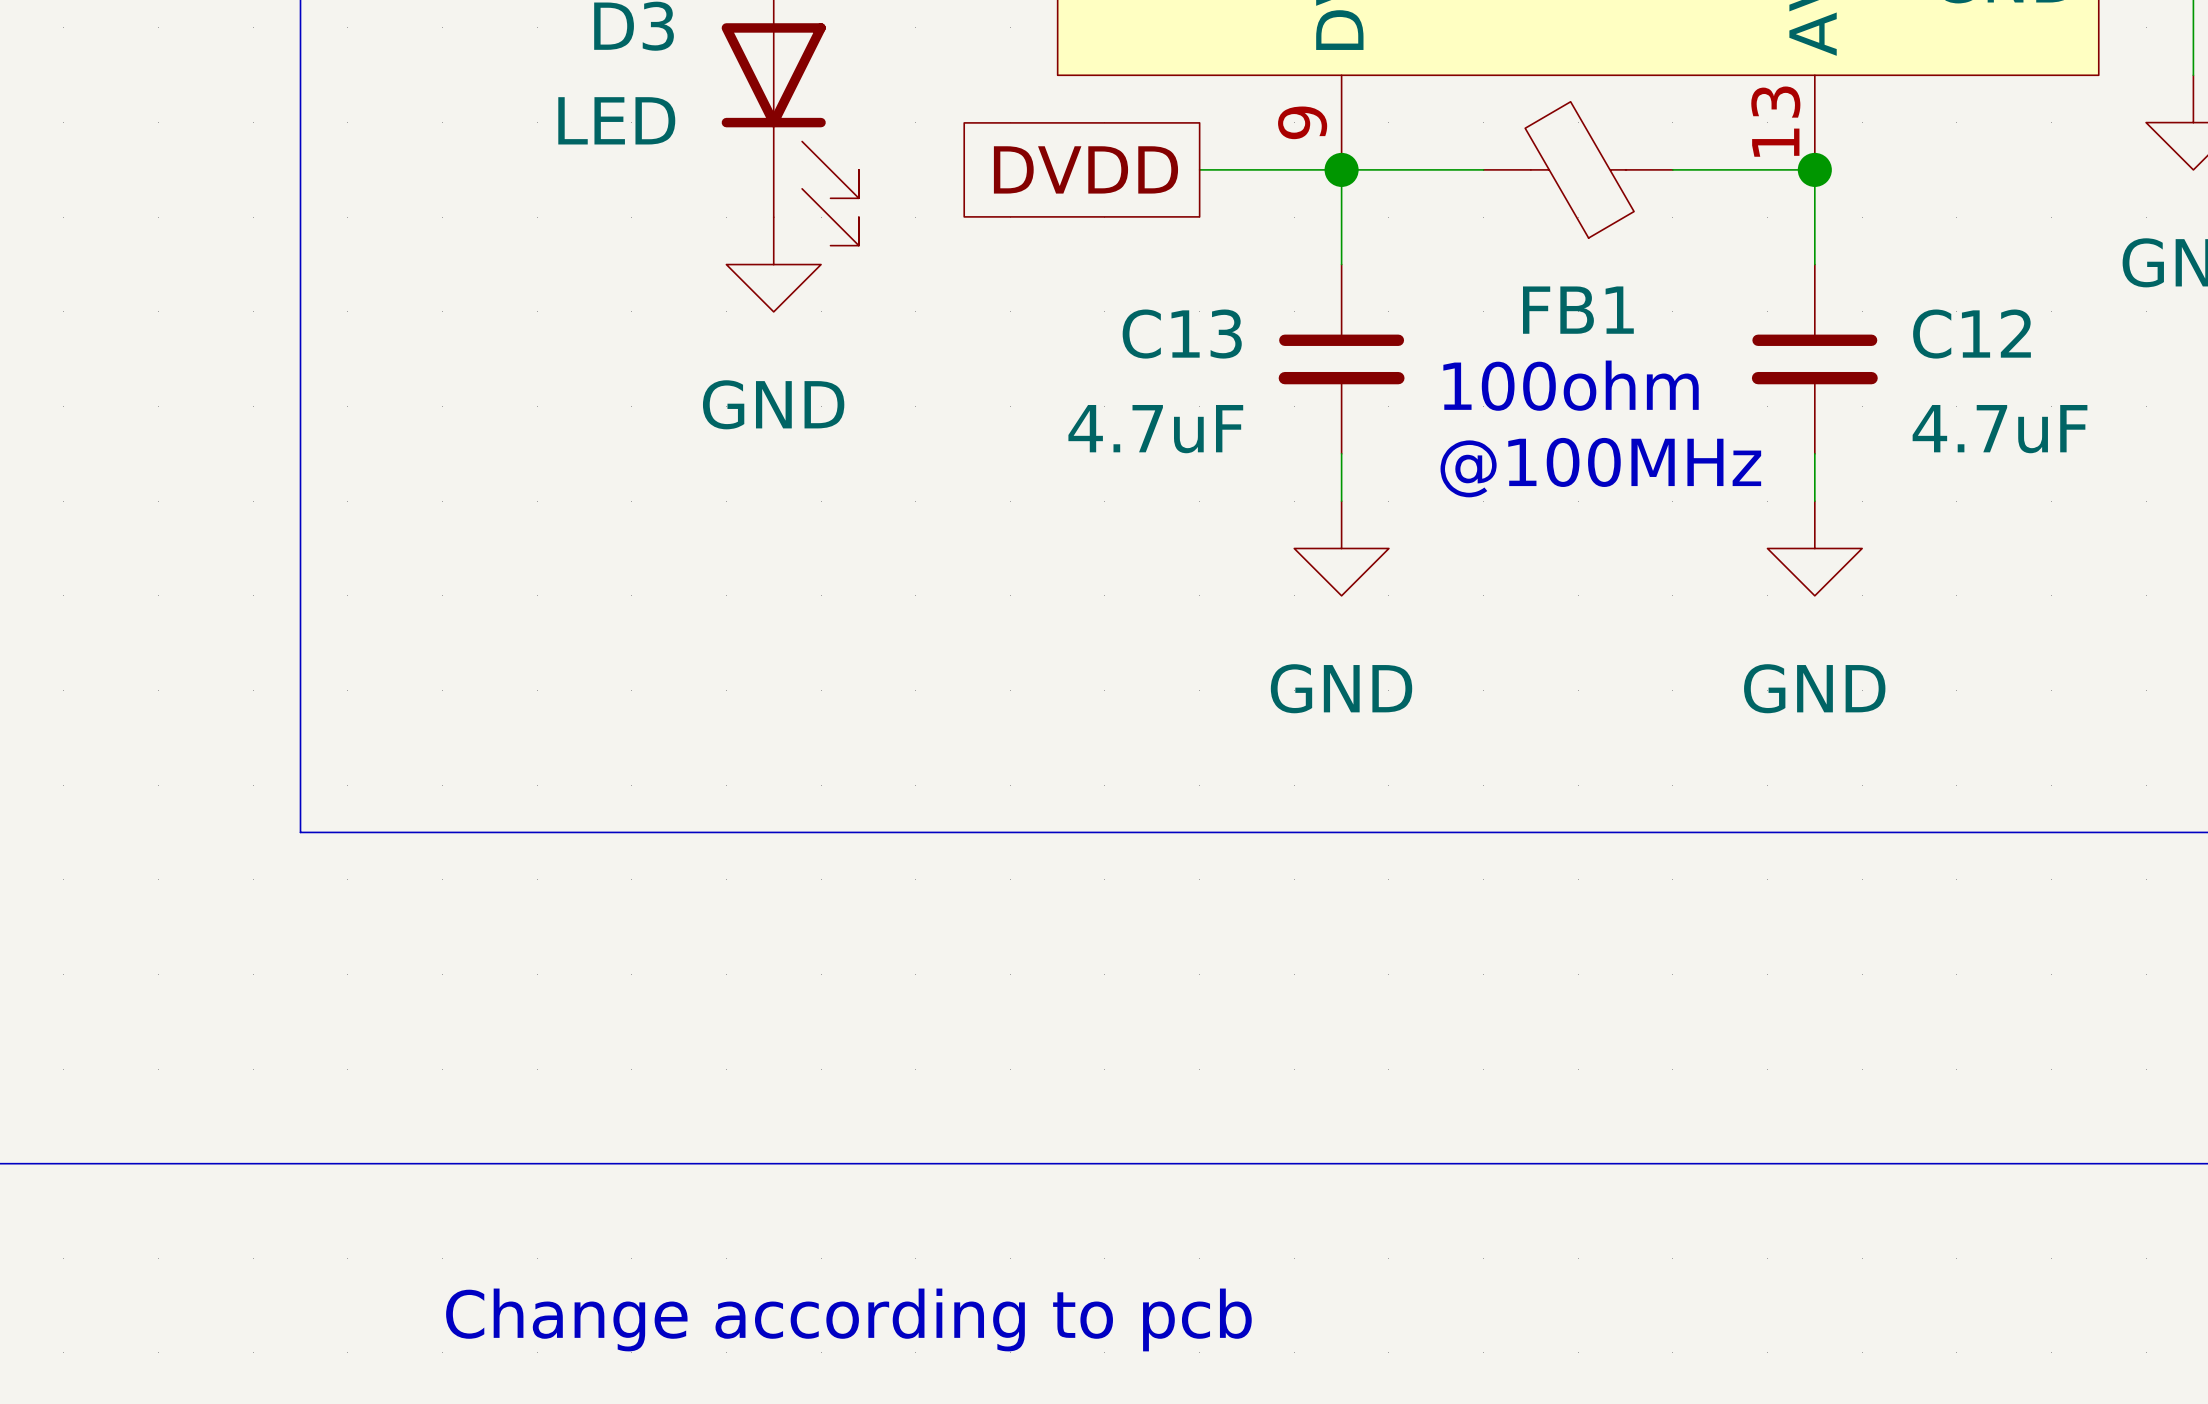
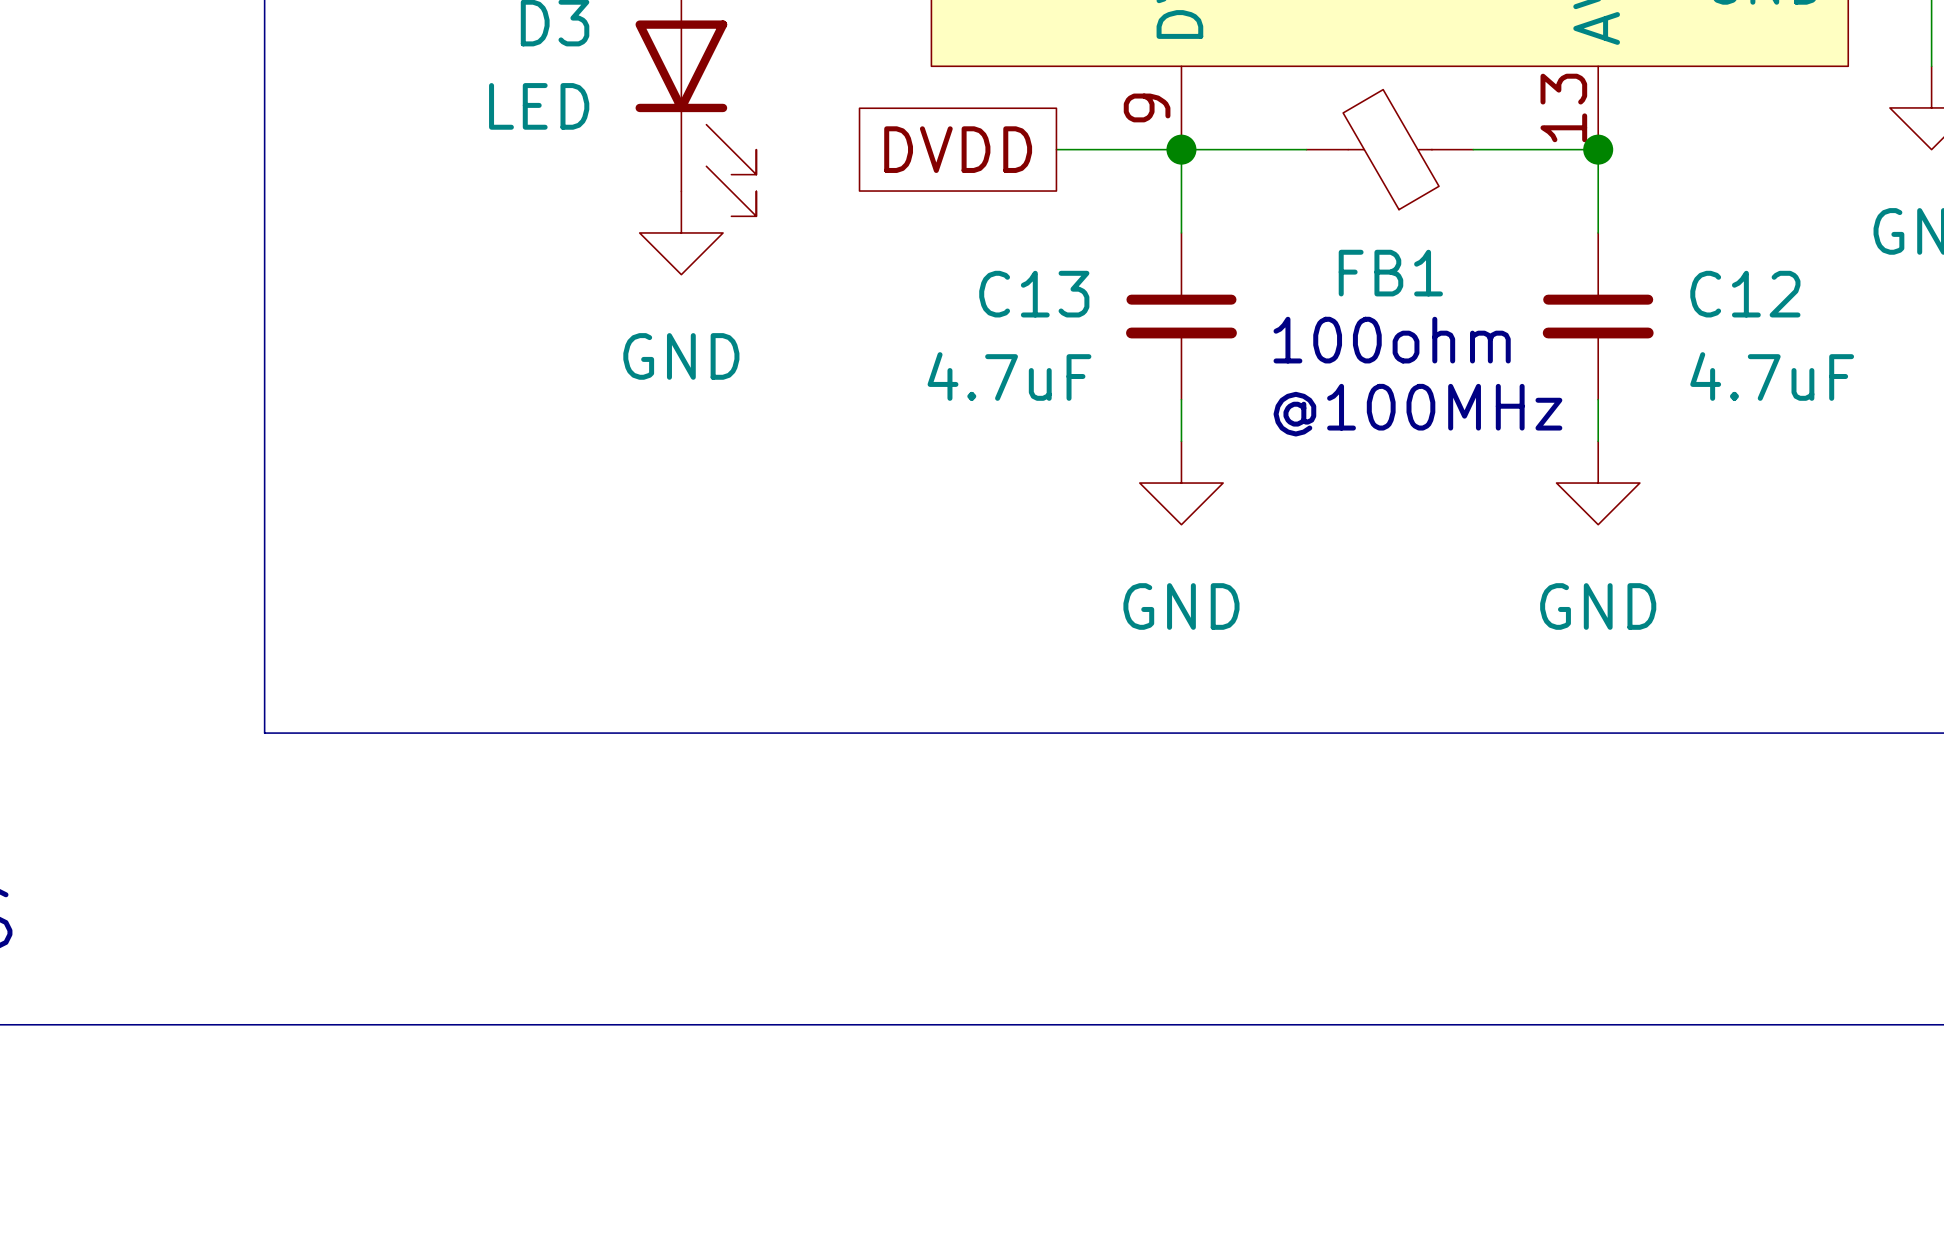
text: Change according to pcb (848, 1319) -> none

